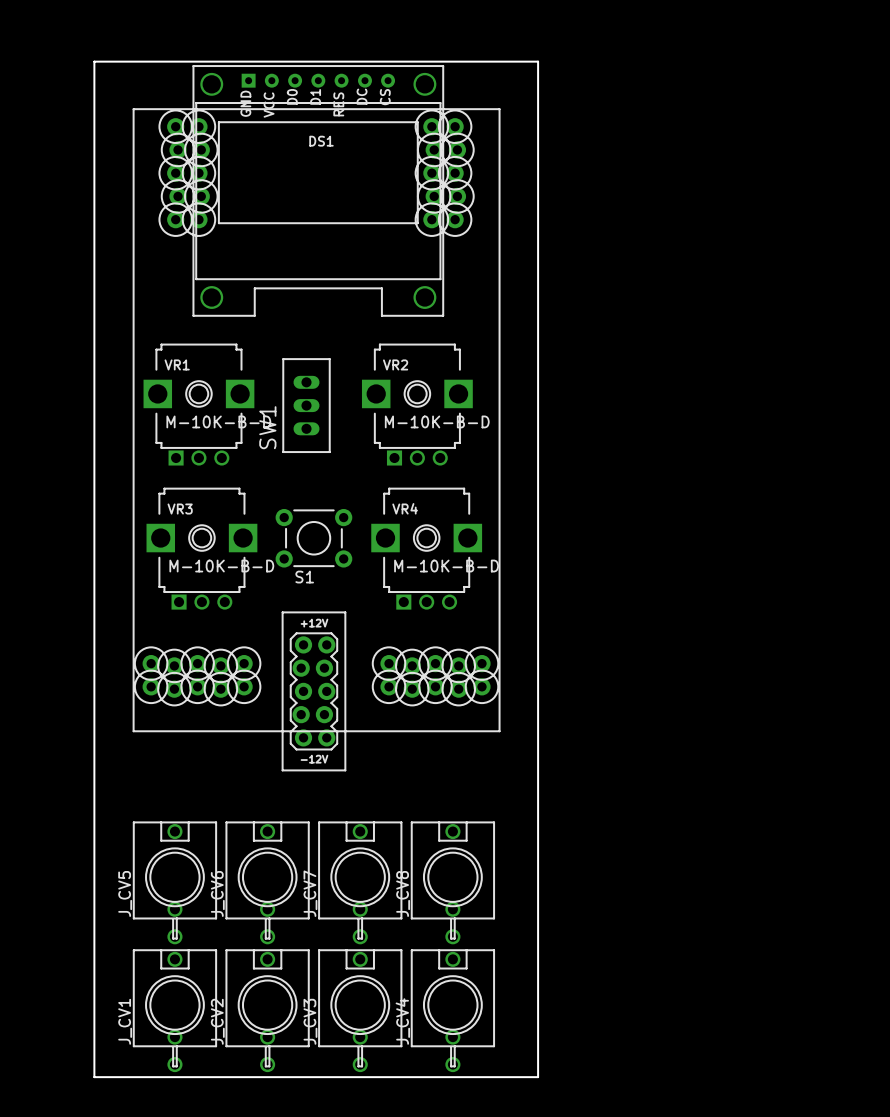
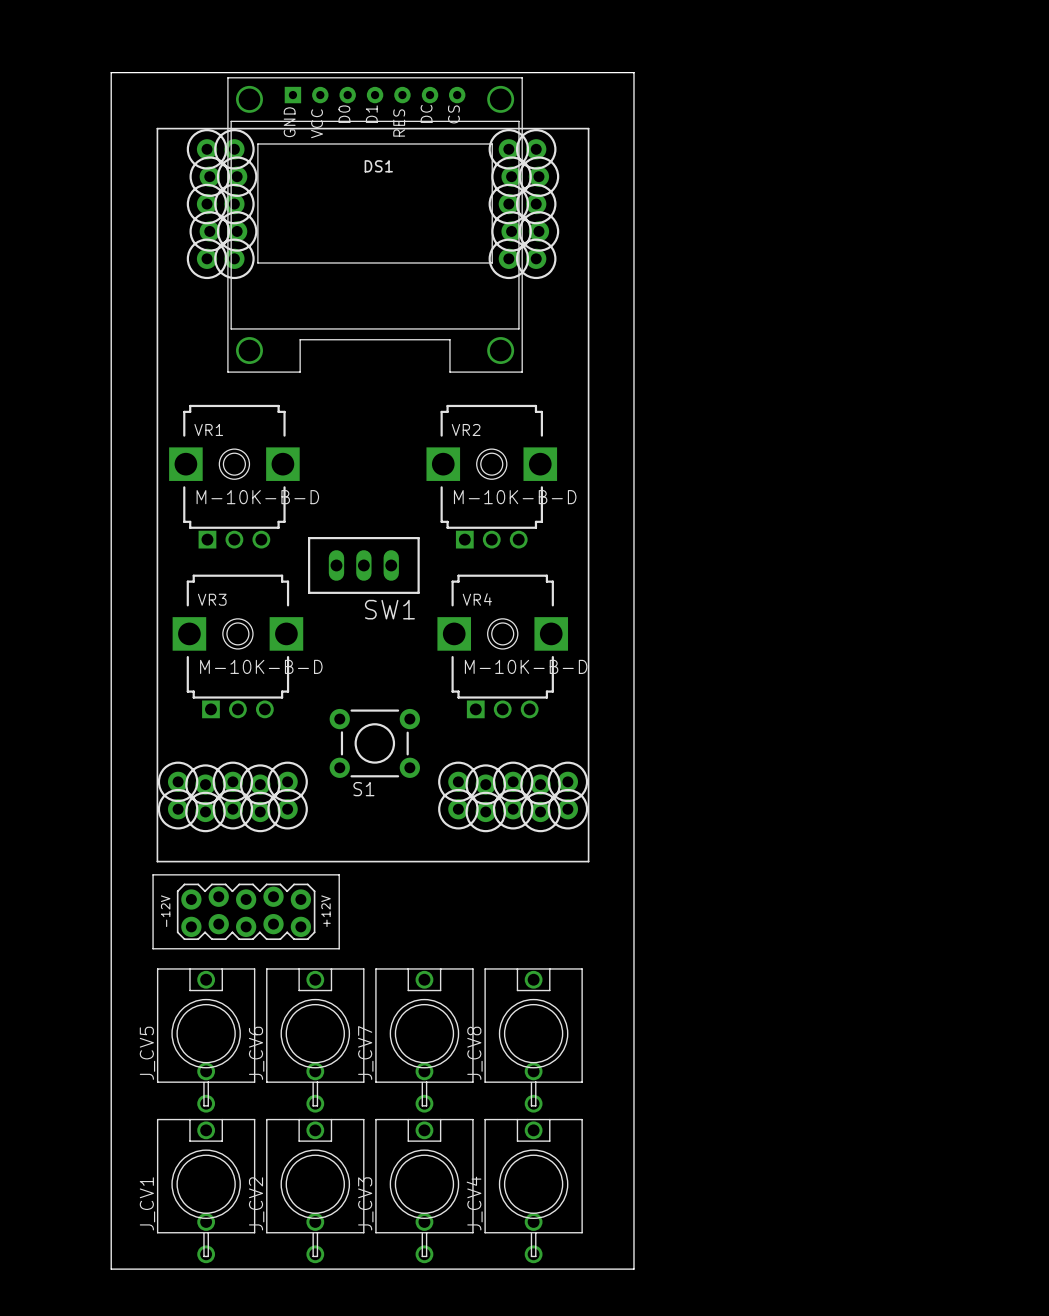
SW1 rotation: 0° (306, 405) -> 90° clockwise (363, 565)
SW1 position: (306, 405) -> (363, 565)
SW1 name position: SW1 (267, 427) -> SW1 (389, 609)
S1 position: (313, 538) -> (374, 743)
part rotation: 0° (313, 691) -> 90° clockwise (246, 911)
part position: (313, 691) -> (246, 911)

